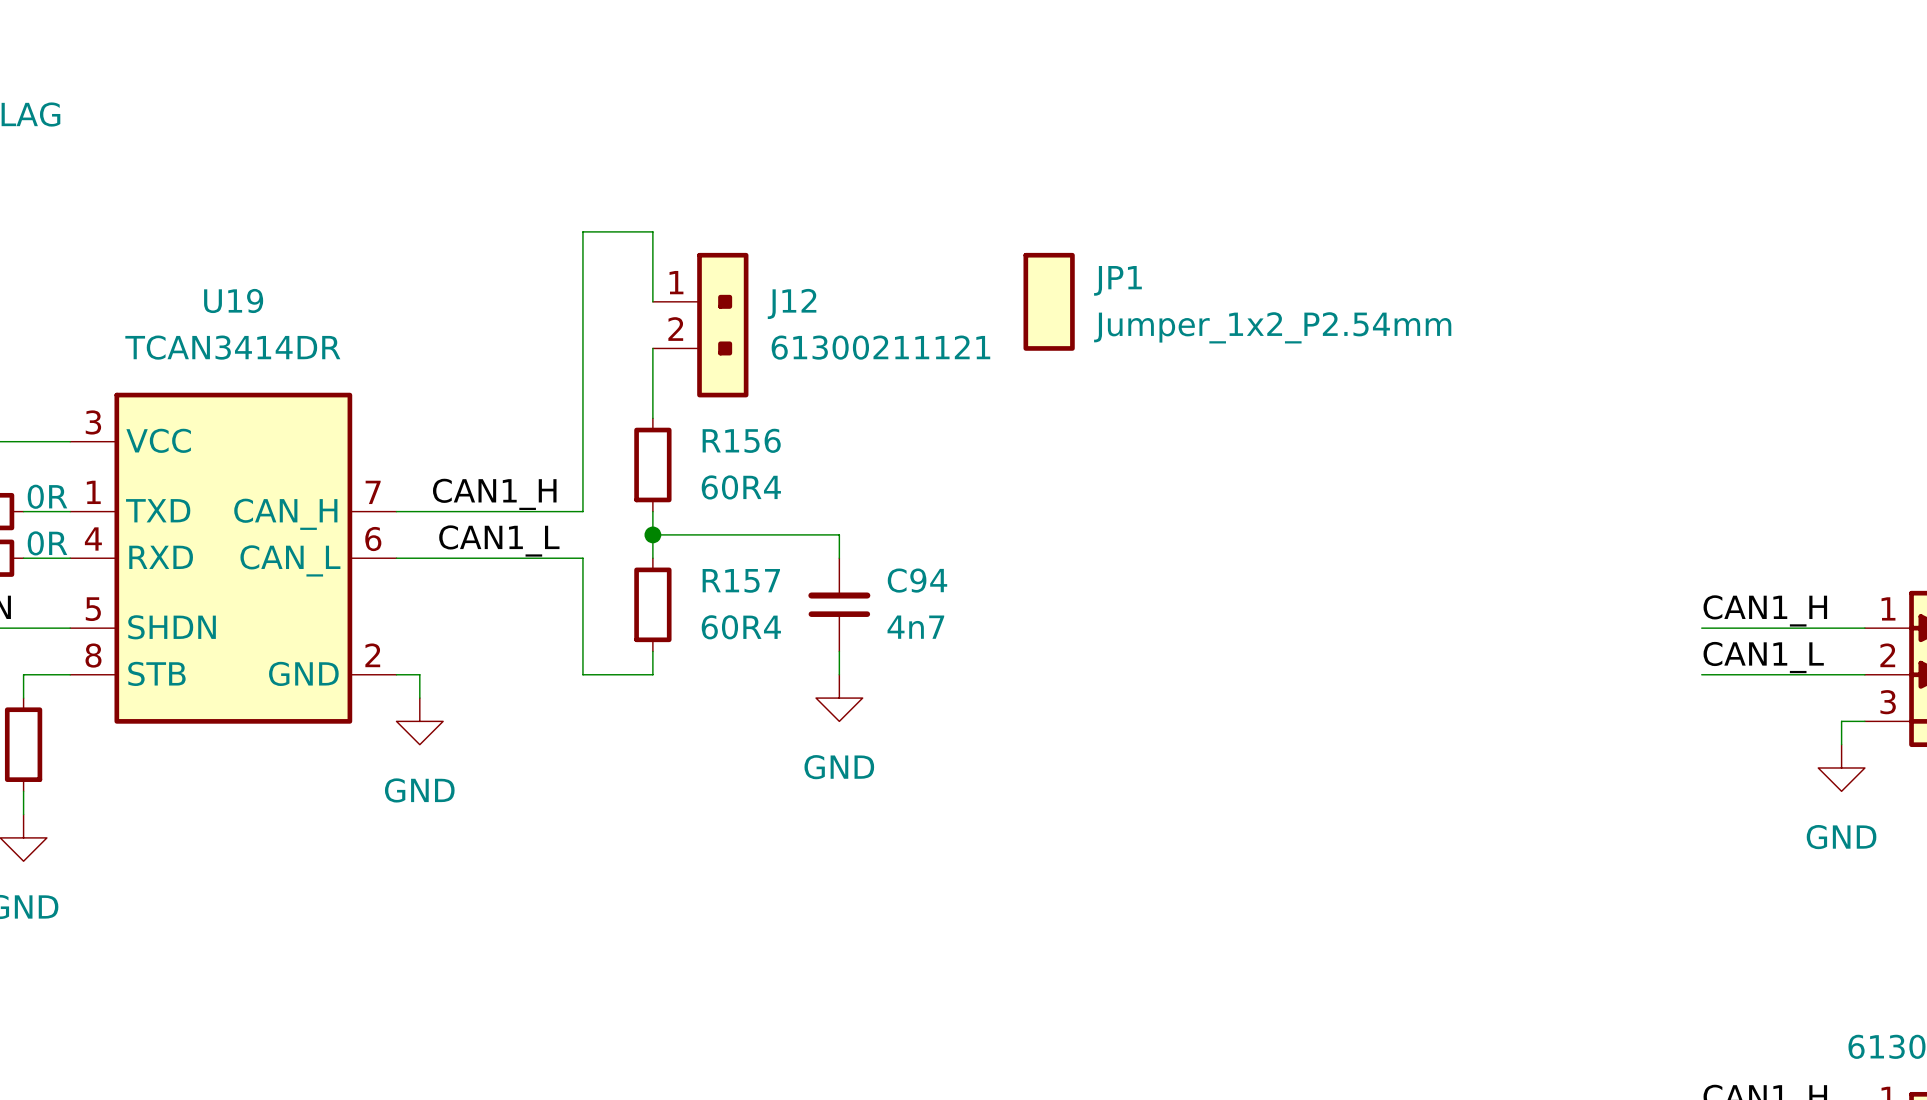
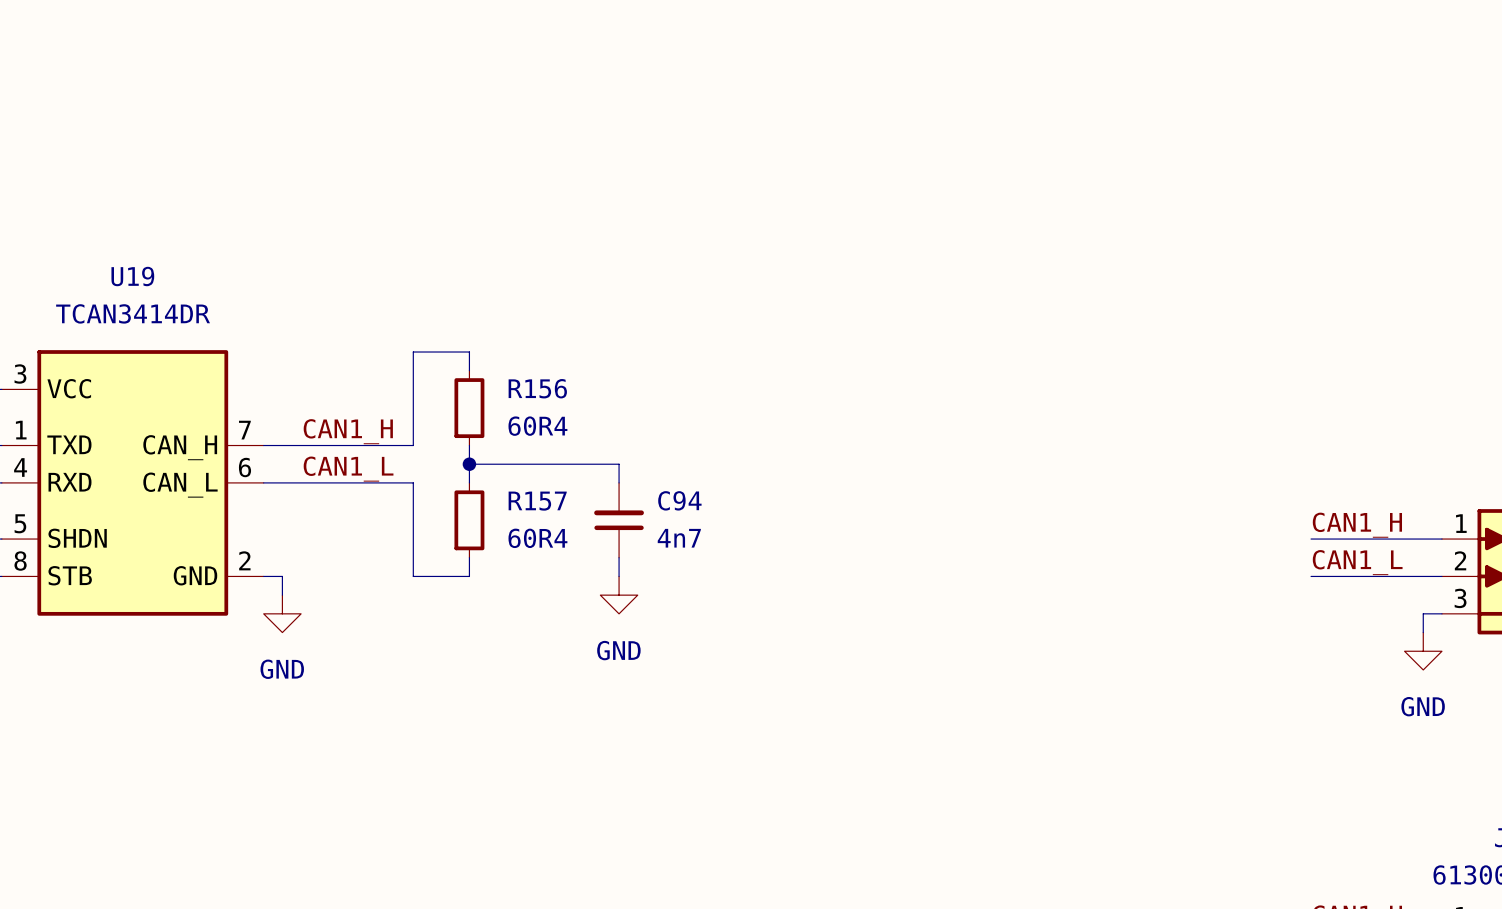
wire: (652, 301) (652, 231) (582, 231) (582, 395) -> none
JP1: Jumper_1x2_P2.54mm (1049, 301) -> none
J12: (700, 325) -> none
wire: (652, 348) (652, 395) -> (413, 352) (469, 352)

